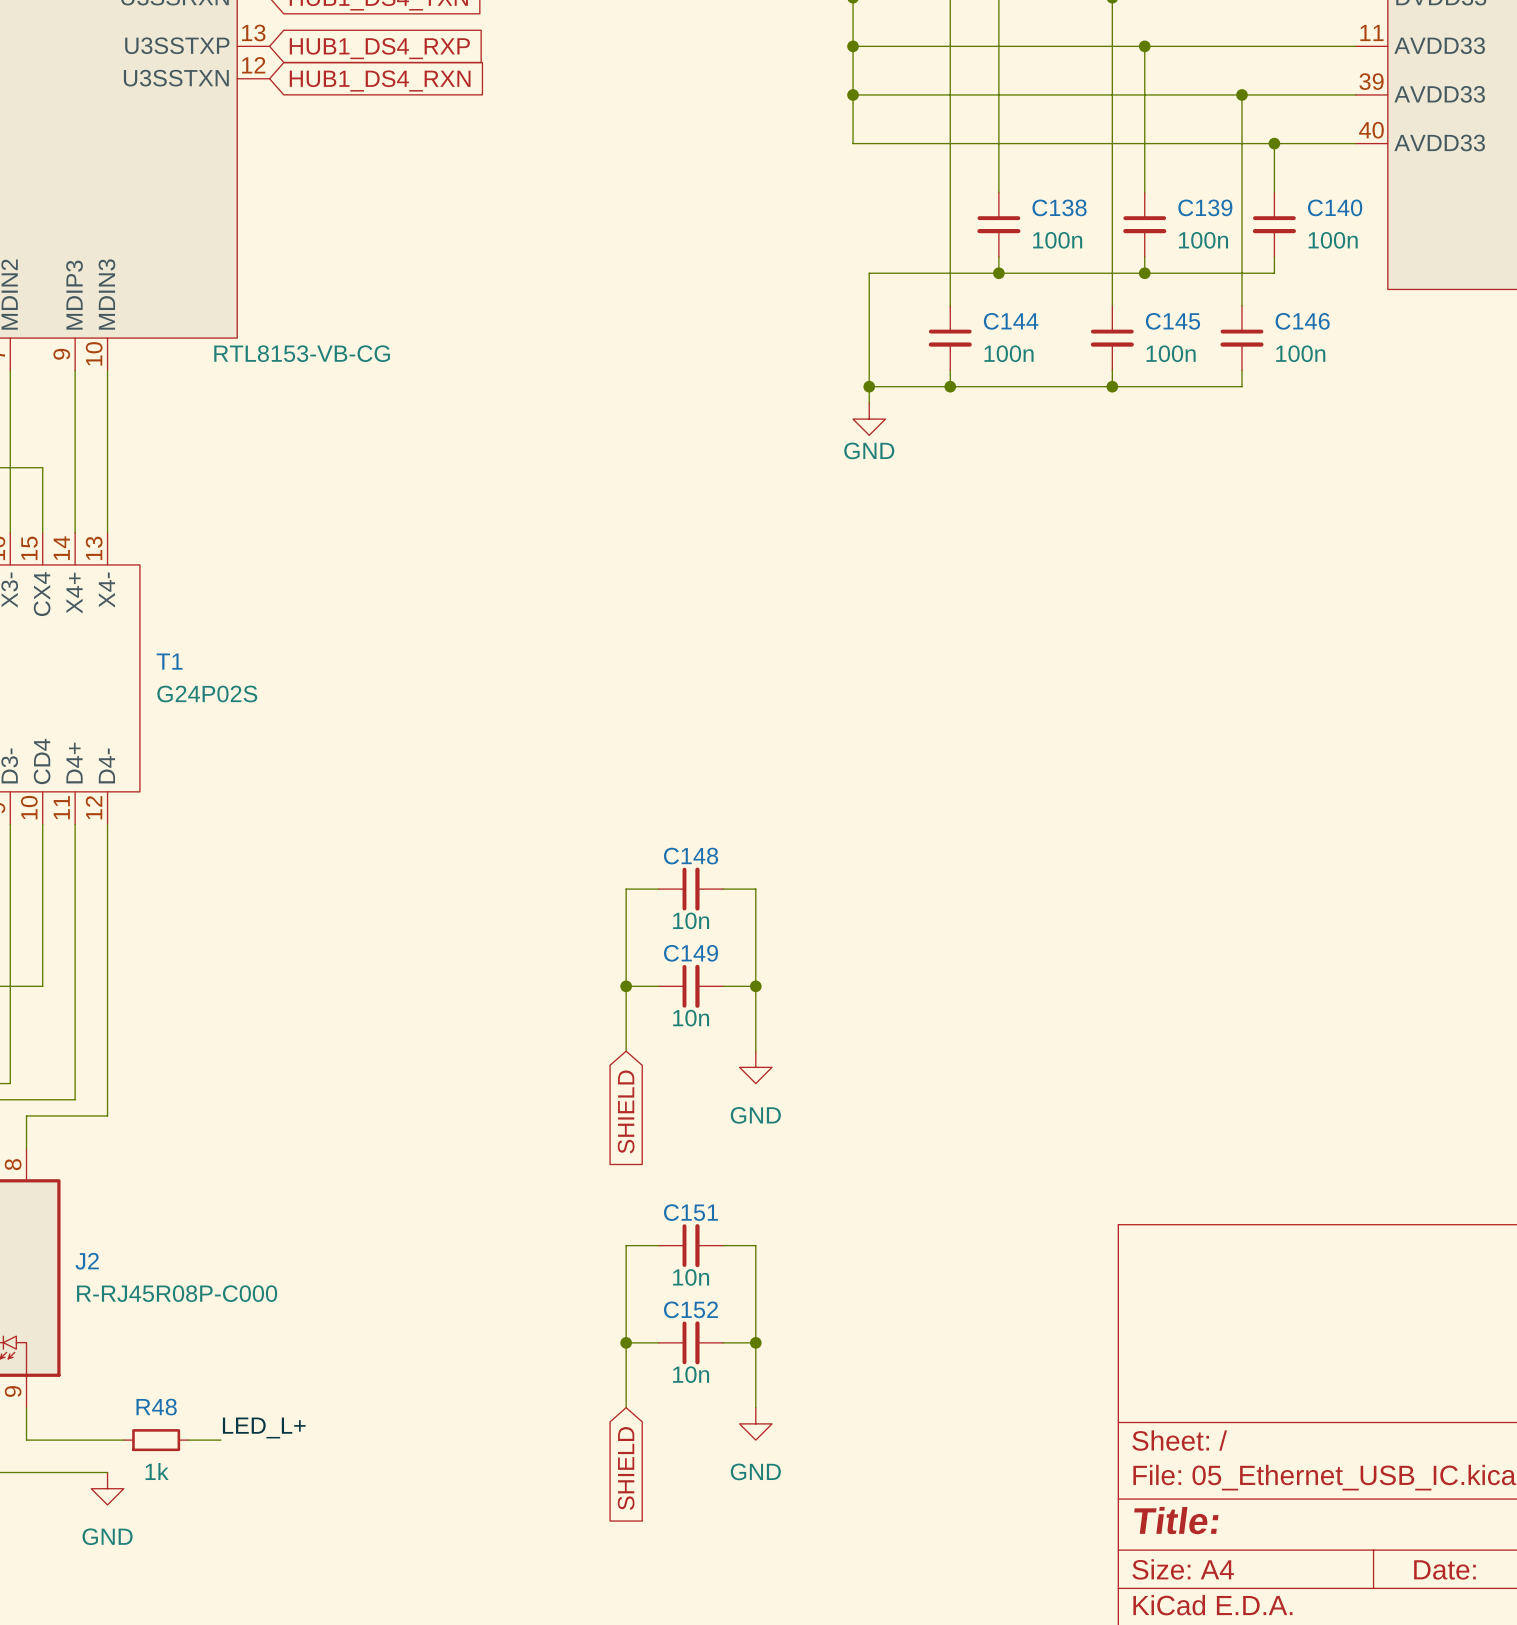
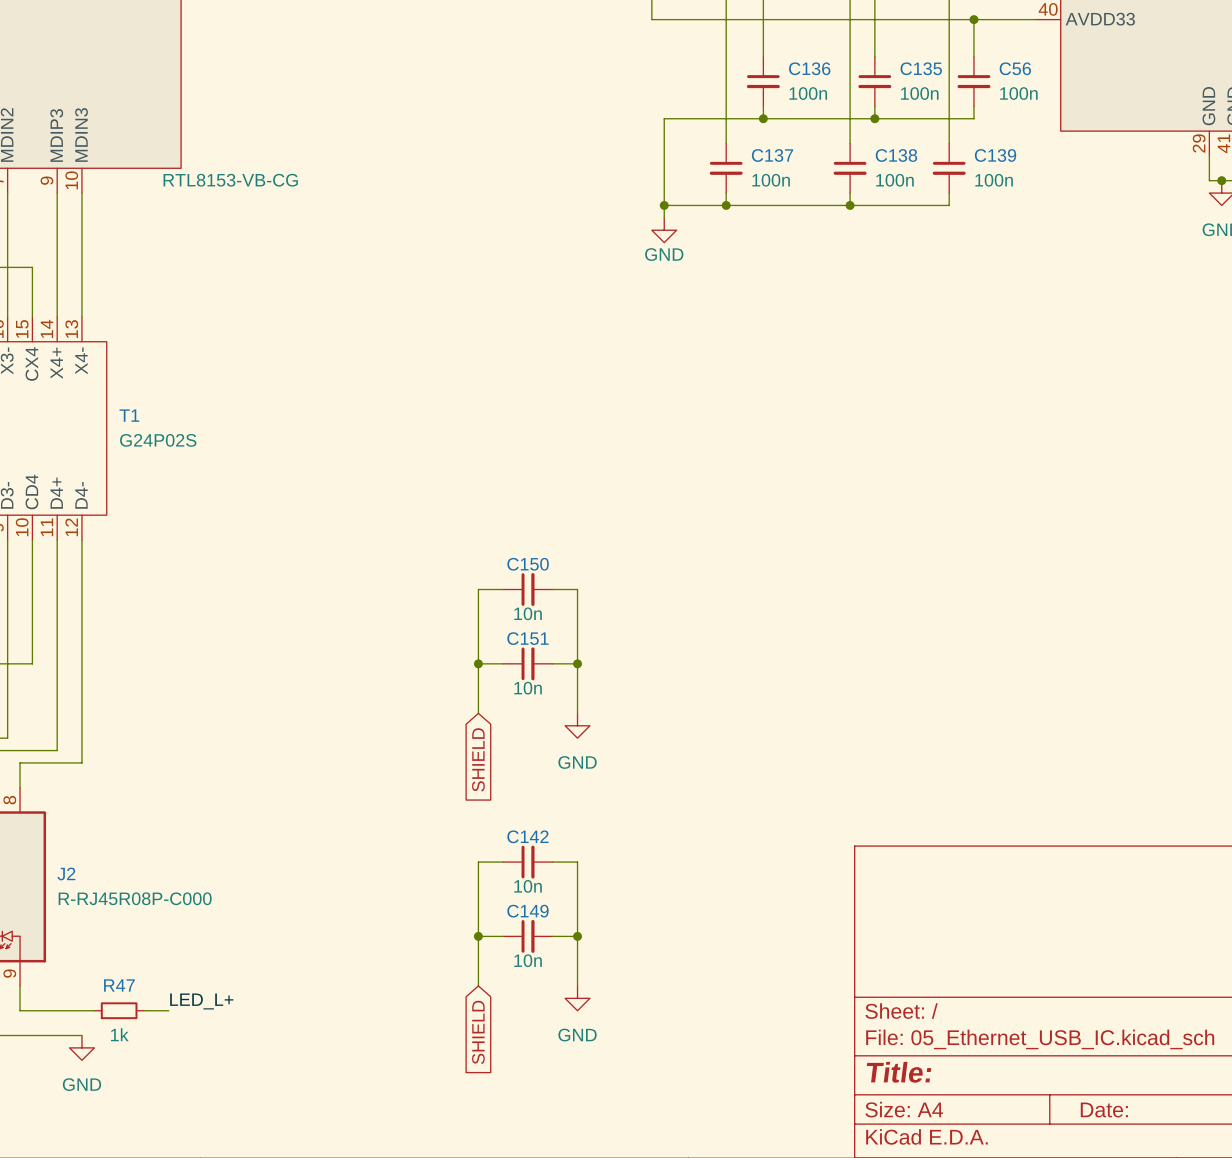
C138 name: C138 (1059, 207) -> C136 (809, 68)
C139 name: C139 (1205, 207) -> C135 (921, 68)
C140 name: C140 (1335, 207) -> C56 (1015, 68)
C144 name: C144 (1011, 321) -> C137 (772, 155)
C145 name: C145 (1173, 321) -> C138 (896, 155)
C146 name: C146 (1302, 321) -> C139 (995, 155)
C148 name: C148 (691, 856) -> C150 (528, 564)
C149 name: C149 (691, 953) -> C151 (527, 638)
C151 name: C151 (690, 1212) -> C142 (527, 836)
C152 name: C152 (690, 1309) -> C149 (528, 911)
R48 name: R48 (156, 1407) -> R47 (119, 985)

